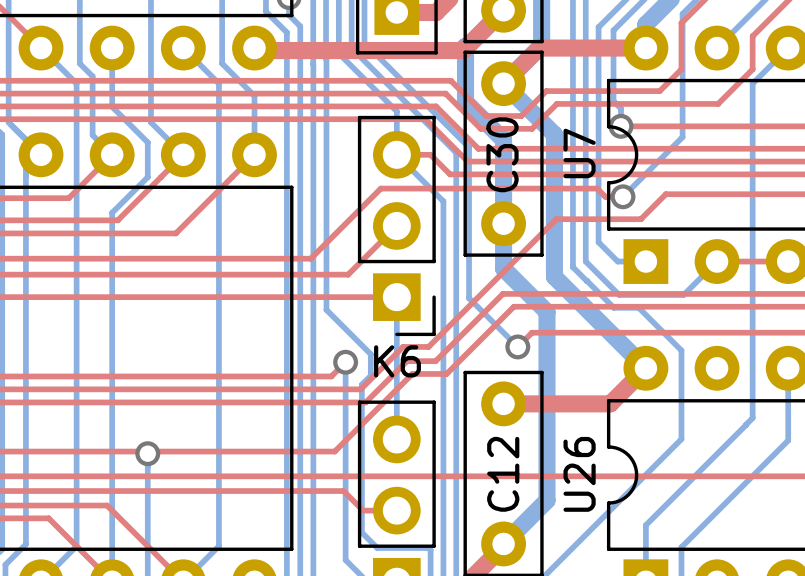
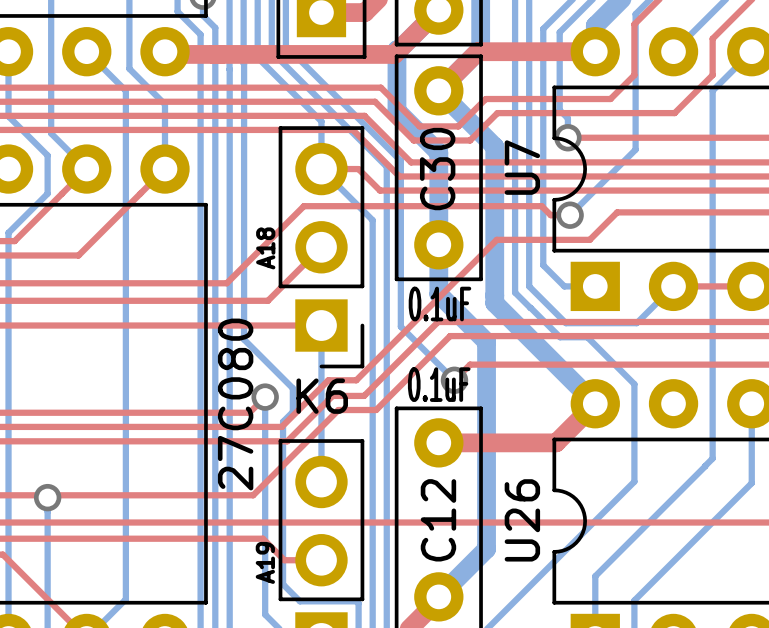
K6 value: none -> A18 (265, 248)
C30 value: none -> 0.1uF (439, 304)
C12 value: none -> 0.1uF (439, 384)
part value: none -> 27C080 (235, 404)
part value: none -> A19 (265, 562)

